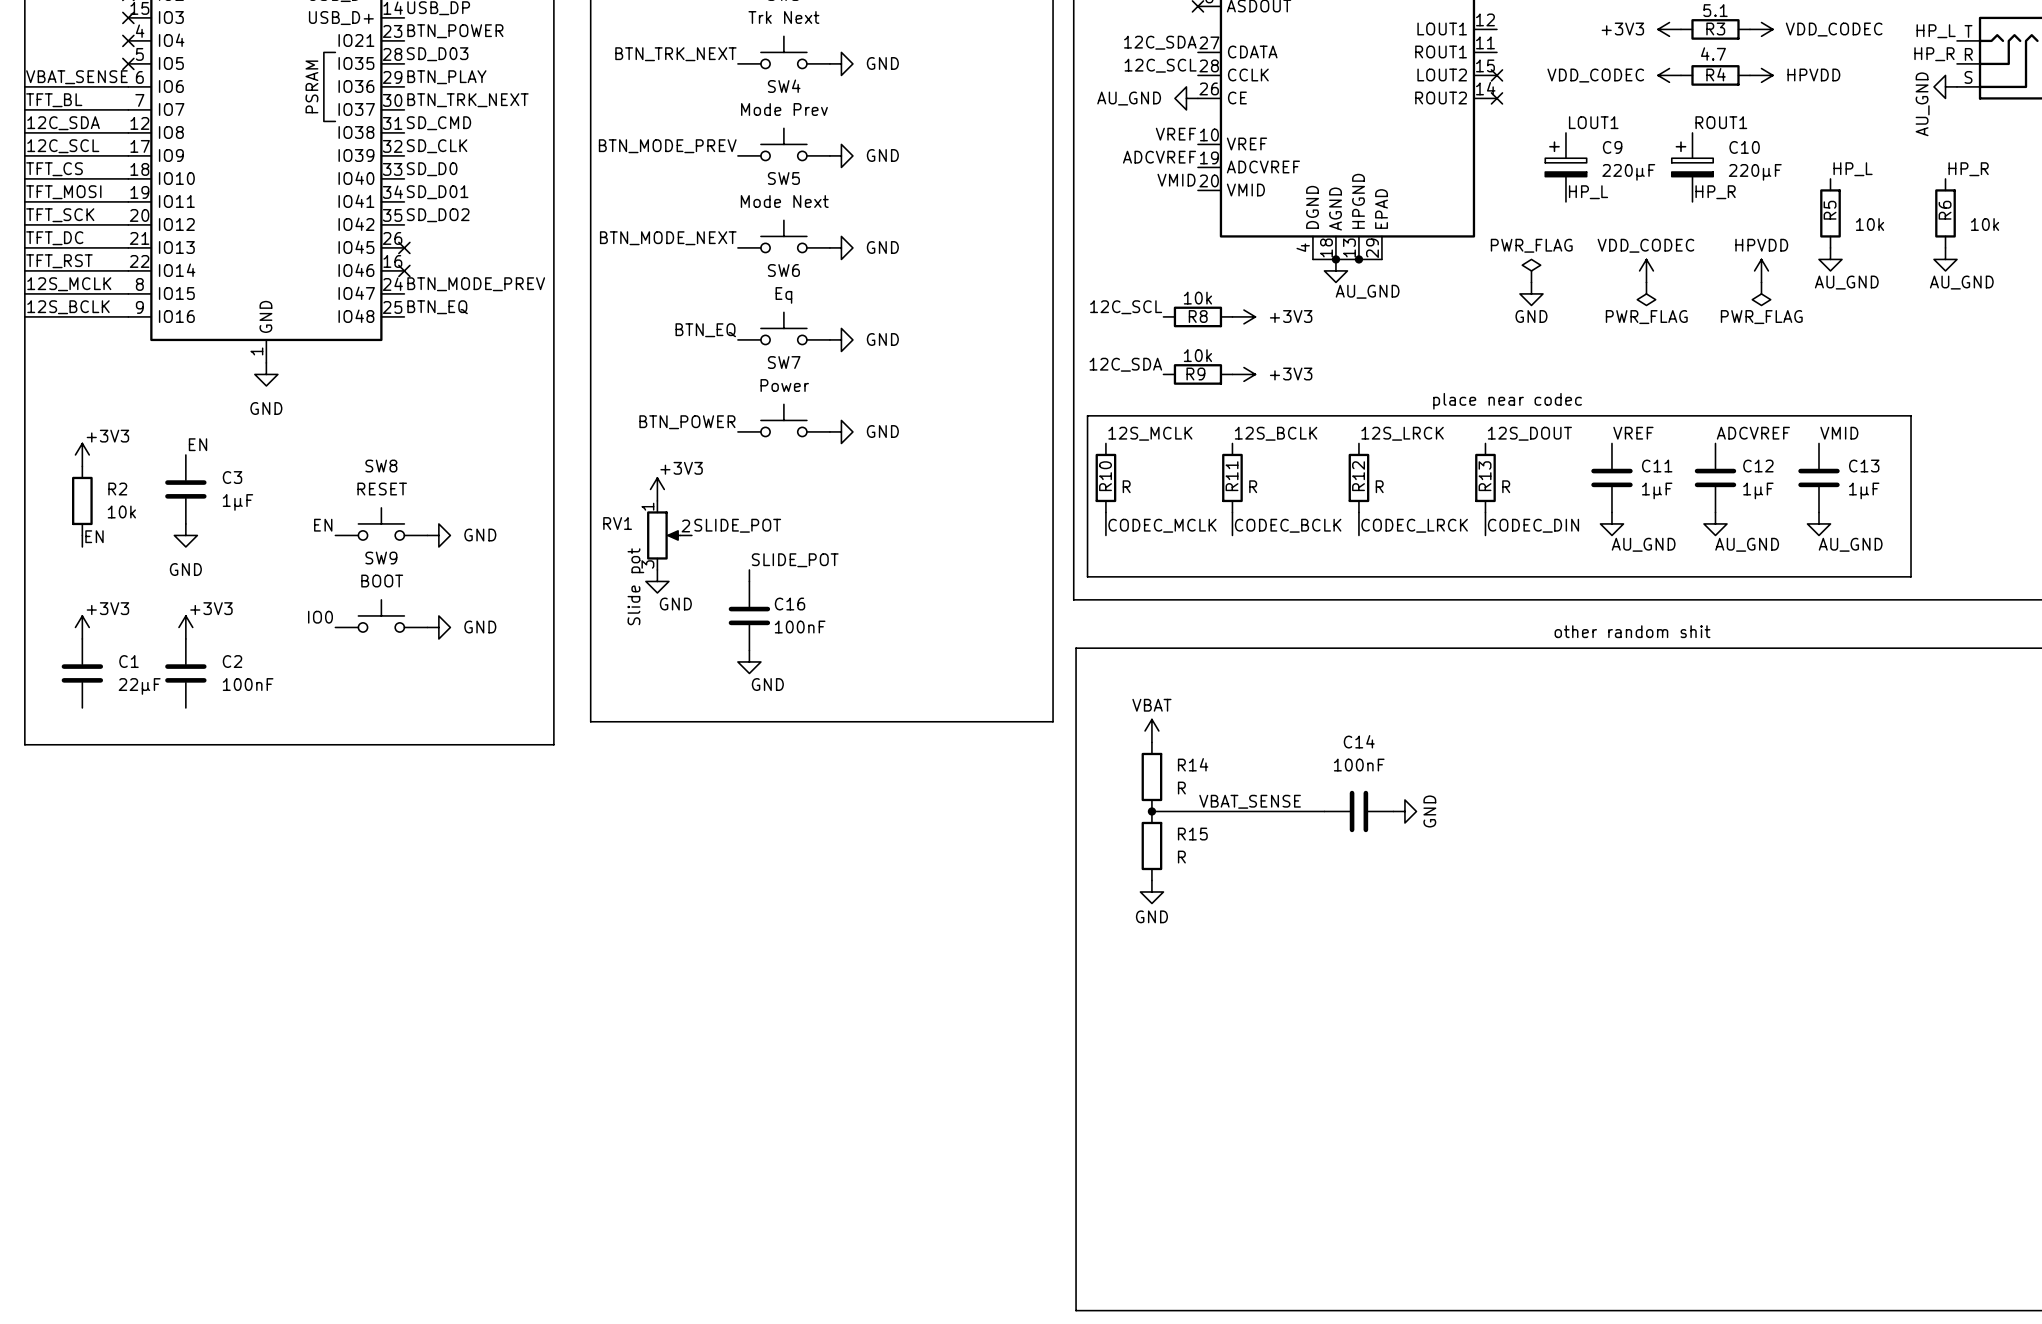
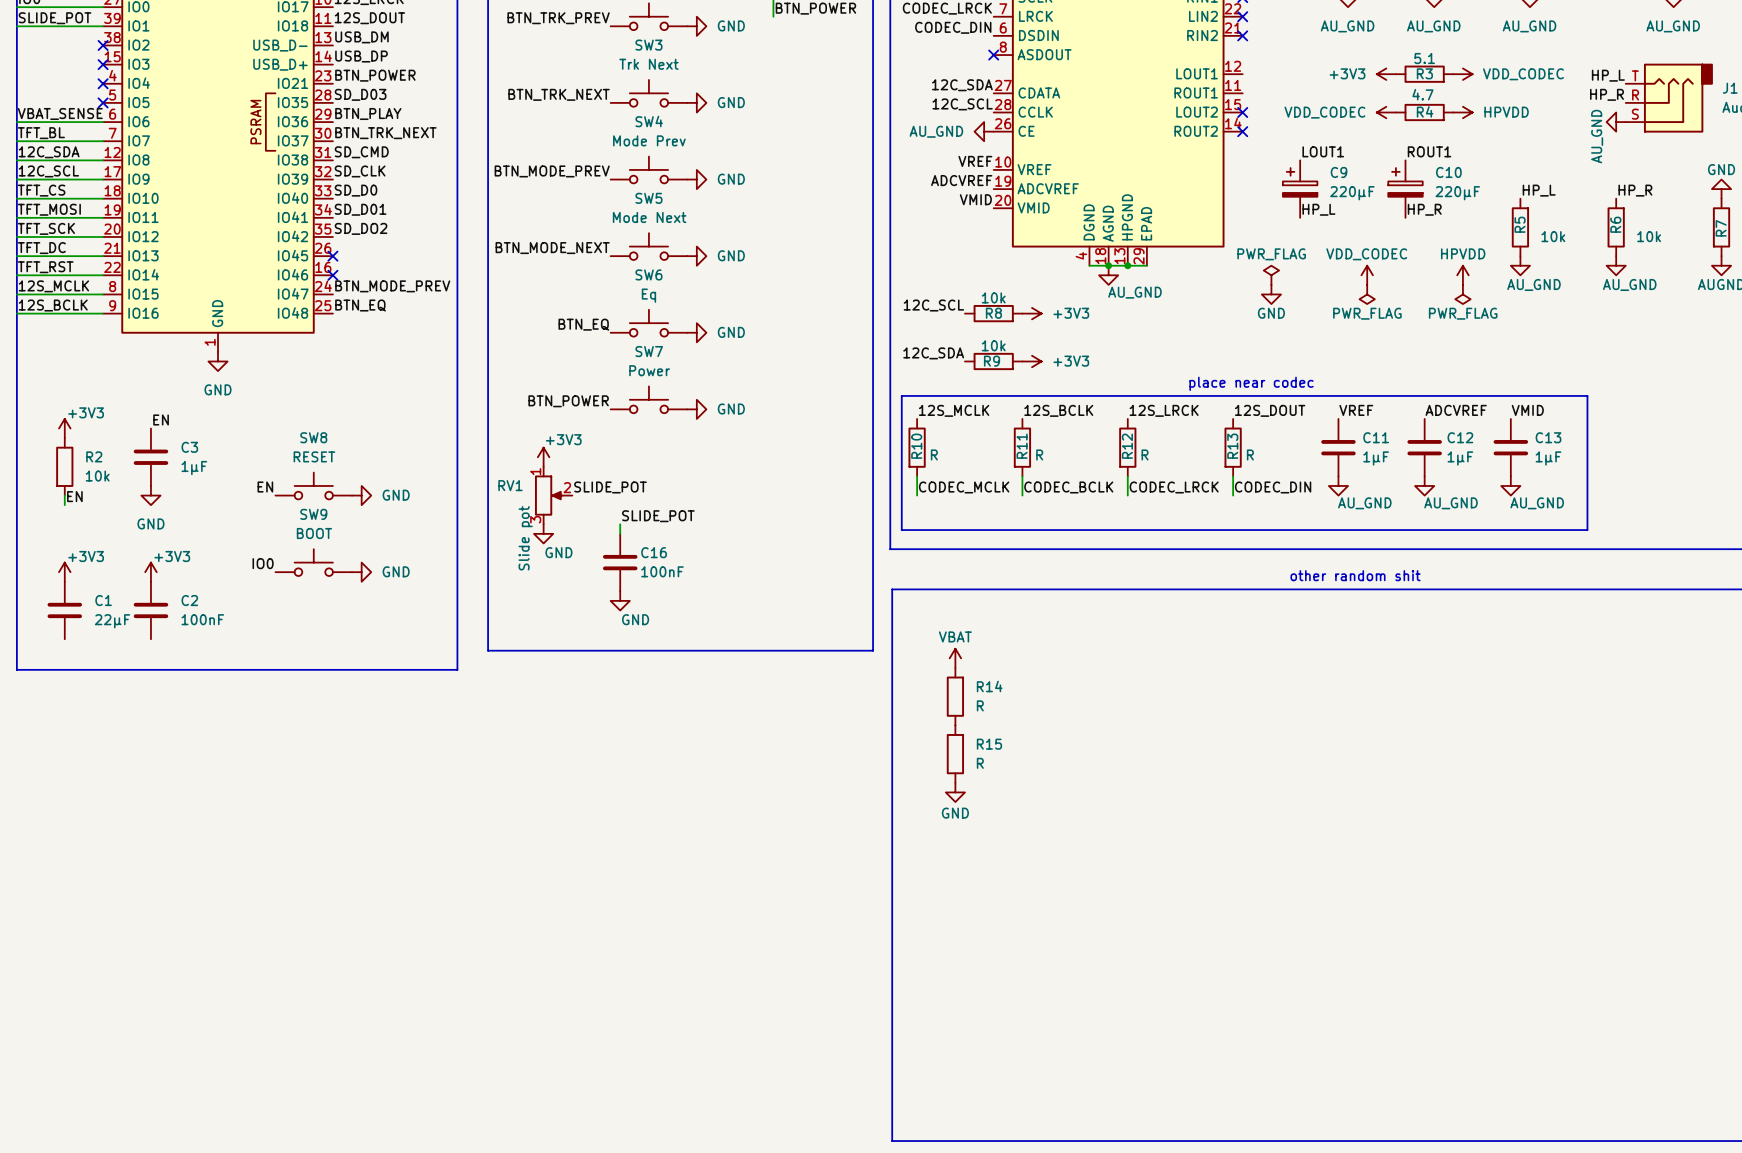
label: VBAT_SENSE (1250, 801) -> none
wire: (1151, 811) (1324, 811) -> none
junction: (1151, 811) -> none
C14: 100nF (1358, 811) -> none
power symbol: GND (1404, 811) -> none

